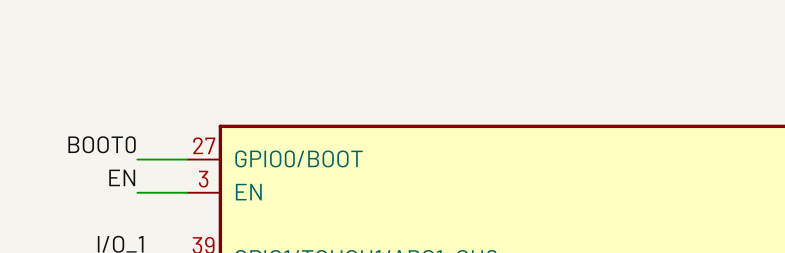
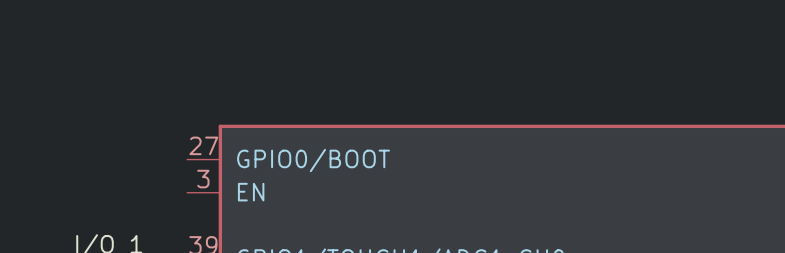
label: BOOT0 (102, 144) -> none
wire: (137, 159) (187, 159) -> none
label: EN (122, 177) -> none
wire: (137, 192) (187, 192) -> none

